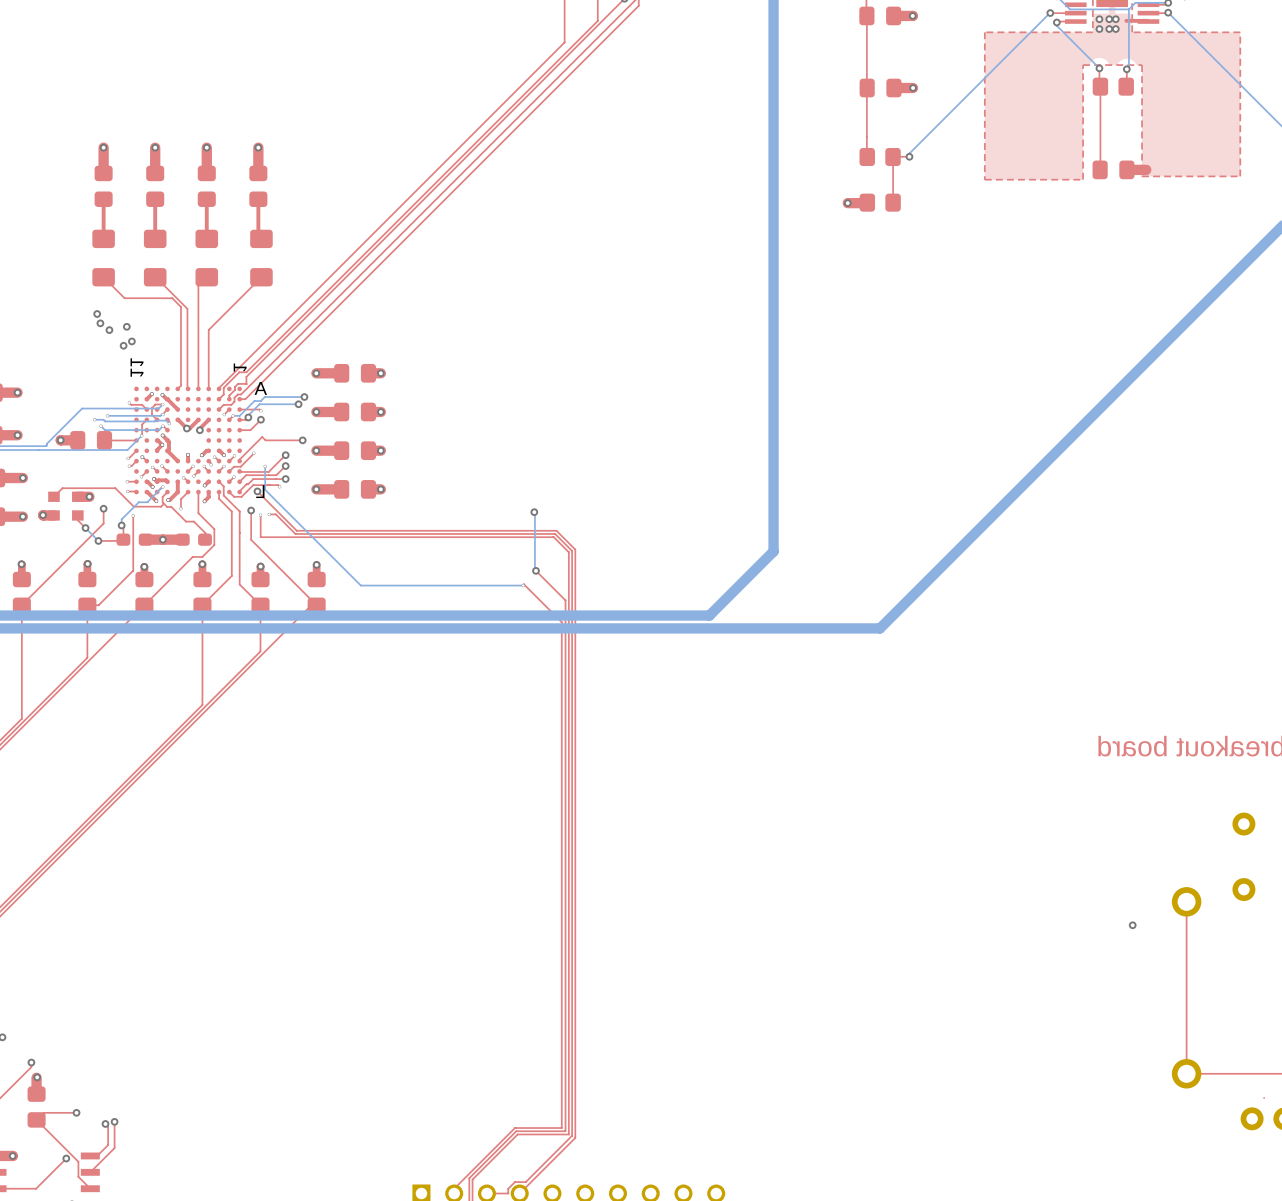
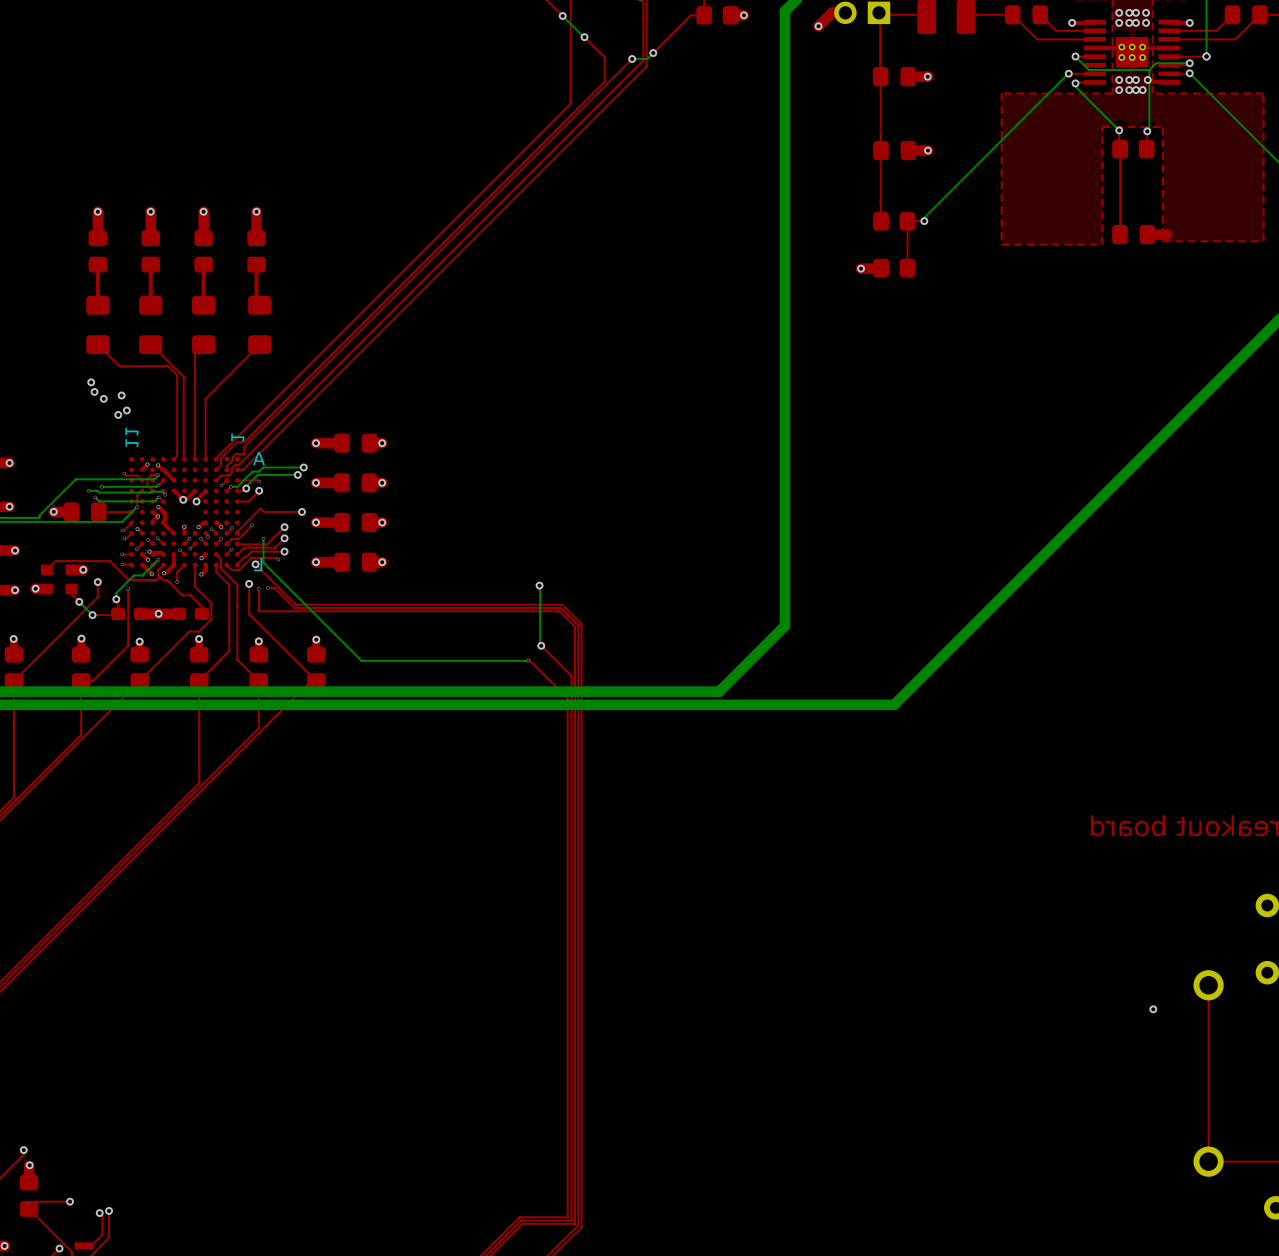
via: none -> (1147, 80)
via: none -> (1142, 90)

